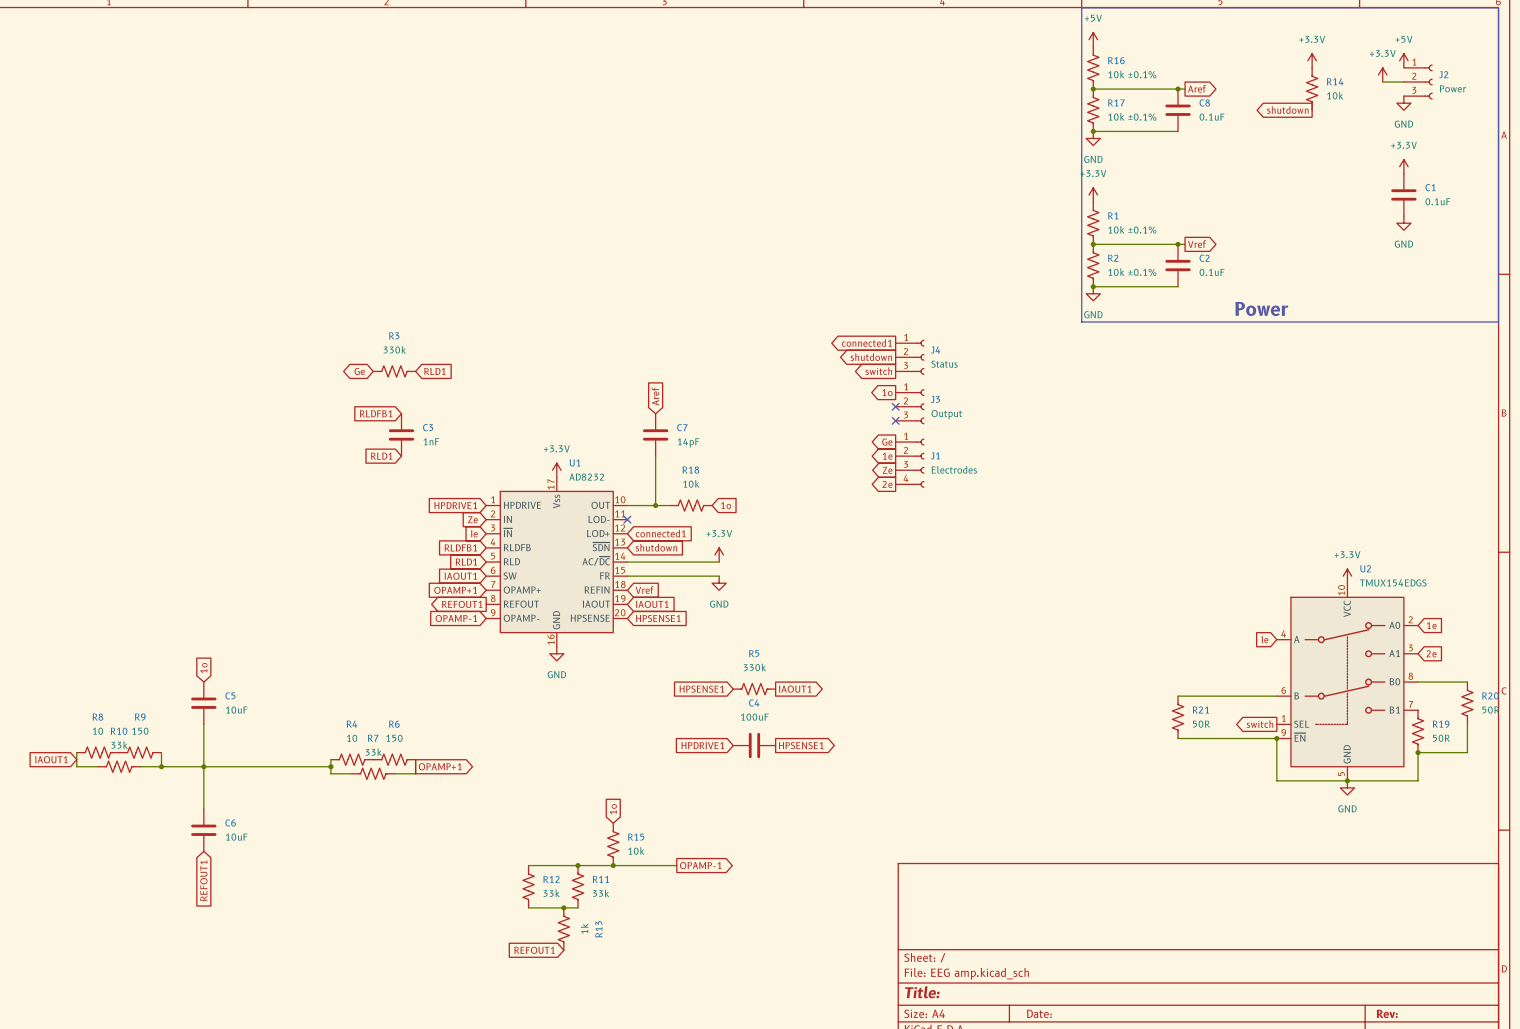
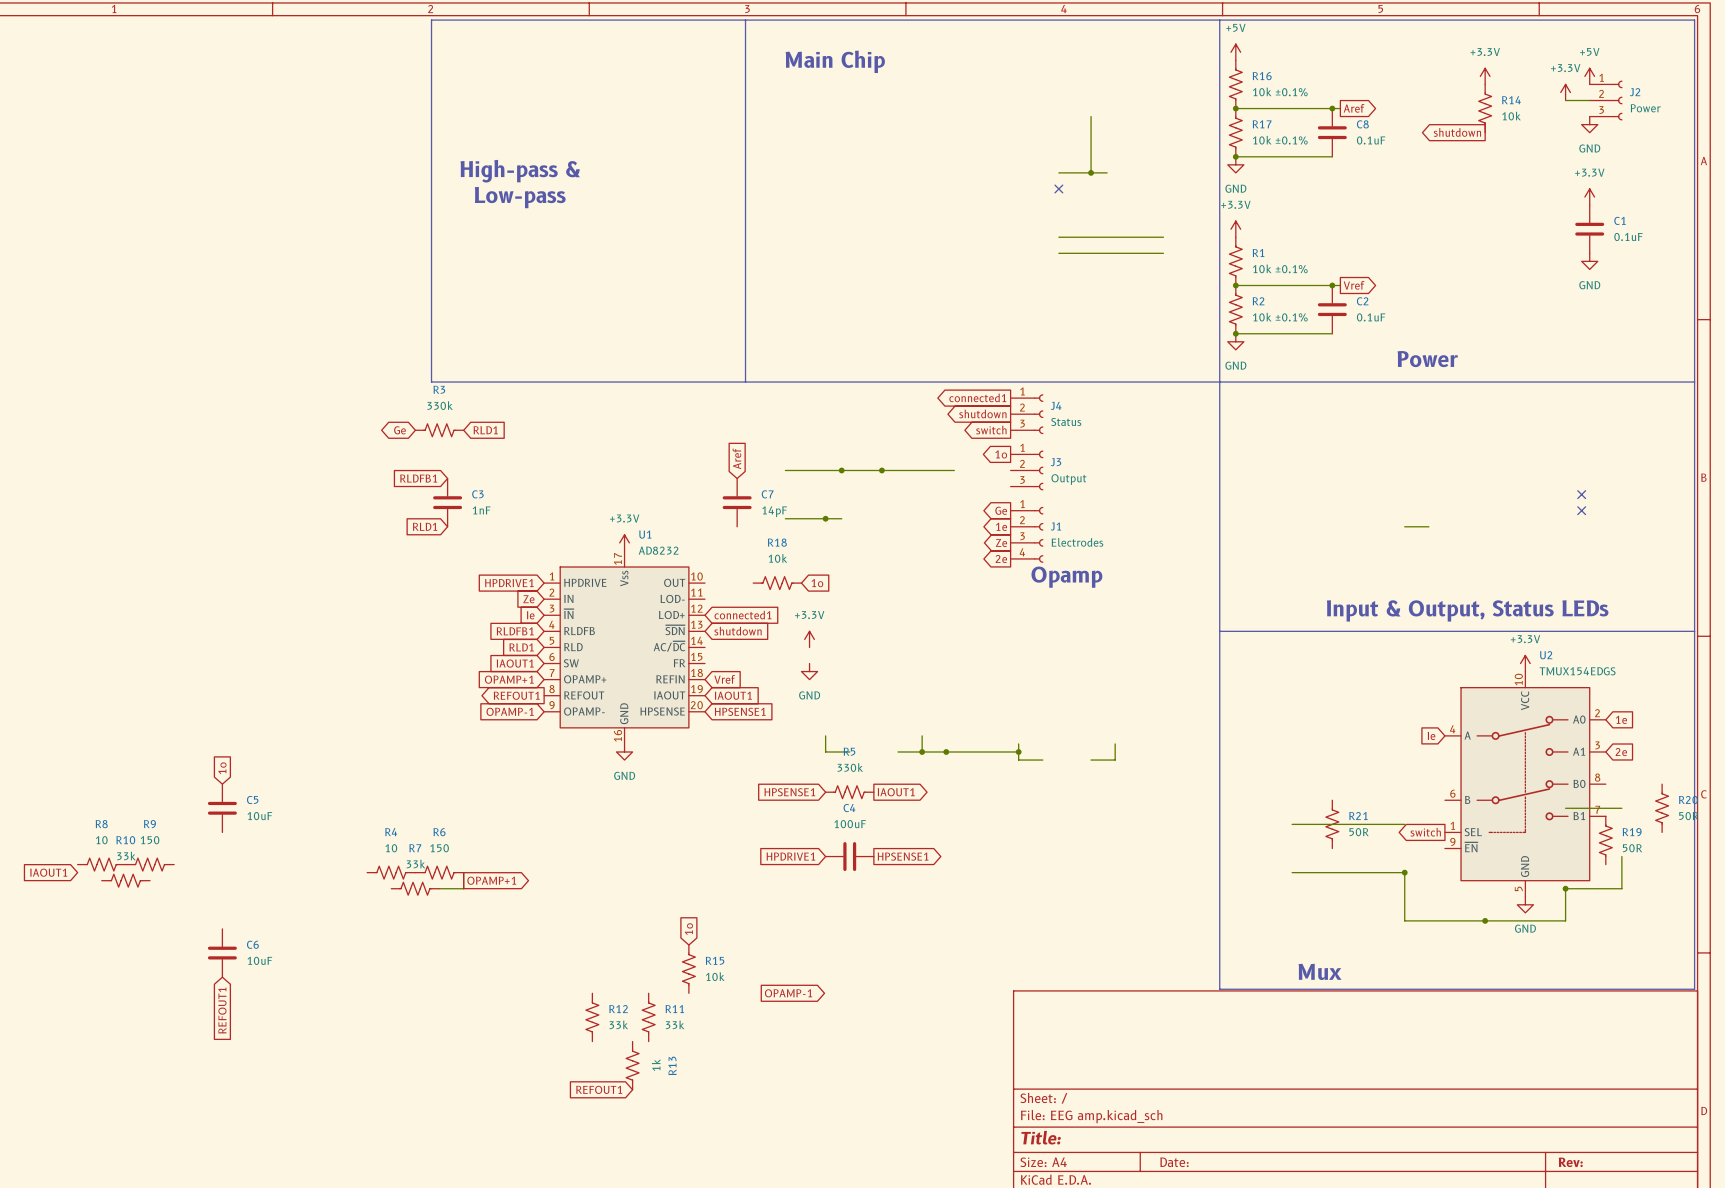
line: (1081, 7) (1498, 7) (1498, 322) (1081, 322) (1081, 7) -> none
line: none -> (745, 20) (745, 382)
line: none -> (1219, 20) (1219, 989) (1694, 989) (1694, 20) (431, 20) (431, 382) (1694, 382)
text: none -> Main Chip (835, 61)
wire: none -> (1091, 116) (1091, 172)
text: none -> High-pass & (520, 171)
wire: none -> (1058, 172) (1107, 172)
junction: none -> (1091, 172)
no-connect mark: none -> (1058, 188)
text: none -> Low-pass (520, 197)
wire: none -> (1058, 237) (1163, 237)
wire: none -> (1058, 253) (1163, 253)
wire: none -> (785, 470) (954, 470)
junction: none -> (841, 470)
junction: none -> (881, 470)
no-connect mark: (895, 406) -> none
no-connect mark: (895, 420) -> none
no-connect mark: none -> (1581, 494)
no-connect mark: none -> (1581, 510)
wire: none -> (785, 518) (841, 518)
junction: none -> (825, 518)
wire: (655, 456) (655, 505) -> none
wire: none -> (1404, 526) (1428, 526)
text: none -> Opamp (1066, 577)
wire: (627, 505) (669, 505) -> none
junction: (655, 505) -> none
no-connect mark: (627, 519) -> none
text: none -> Input & Output, Status LEDs (1467, 610)
line: none -> (1219, 631) (1694, 631)
wire: (627, 562) (719, 562) -> none
wire: (627, 576) (719, 576) -> none
wire: none -> (825, 735) (825, 751) (849, 751)
wire: none -> (922, 735) (922, 751)
wire: none -> (1018, 743) (1018, 760) (1042, 760)
wire: none -> (1115, 743) (1115, 760) (1091, 760)
wire: none -> (898, 751) (1018, 751)
junction: none -> (922, 751)
junction: none -> (946, 751)
junction: none -> (1018, 751)
wire: (1418, 682) (1467, 682) -> (1565, 808) (1621, 808)
wire: (1178, 696) (1276, 696) -> (1292, 824) (1404, 824)
wire: (203, 724) (203, 809) -> none
wire: (1467, 724) (1467, 752) (1418, 752) (1418, 780) (1276, 780) (1276, 738) (1178, 738) -> (1621, 856) (1621, 888) (1565, 888) (1565, 920) (1404, 920) (1404, 872) (1292, 872)
junction: (1276, 738) -> none
wire: (76, 752) (76, 766) (97, 766) -> none
wire: (161, 752) (161, 766) -> none
junction: (1418, 752) -> none
wire: (330, 759) (330, 773) (352, 773) -> none
junction: none -> (1404, 872)
wire: (140, 766) (330, 766) -> none
junction: (161, 766) -> none
junction: (203, 766) -> none
junction: (330, 766) -> none
junction: none -> (1565, 888)
junction: (1347, 780) -> none
junction: none -> (1485, 920)
text: none -> Mux (1320, 971)
wire: (528, 865) (676, 865) -> none
junction: (577, 865) -> none
junction: (613, 865) -> none
wire: (528, 907) (577, 907) -> none
junction: (563, 907) -> none

